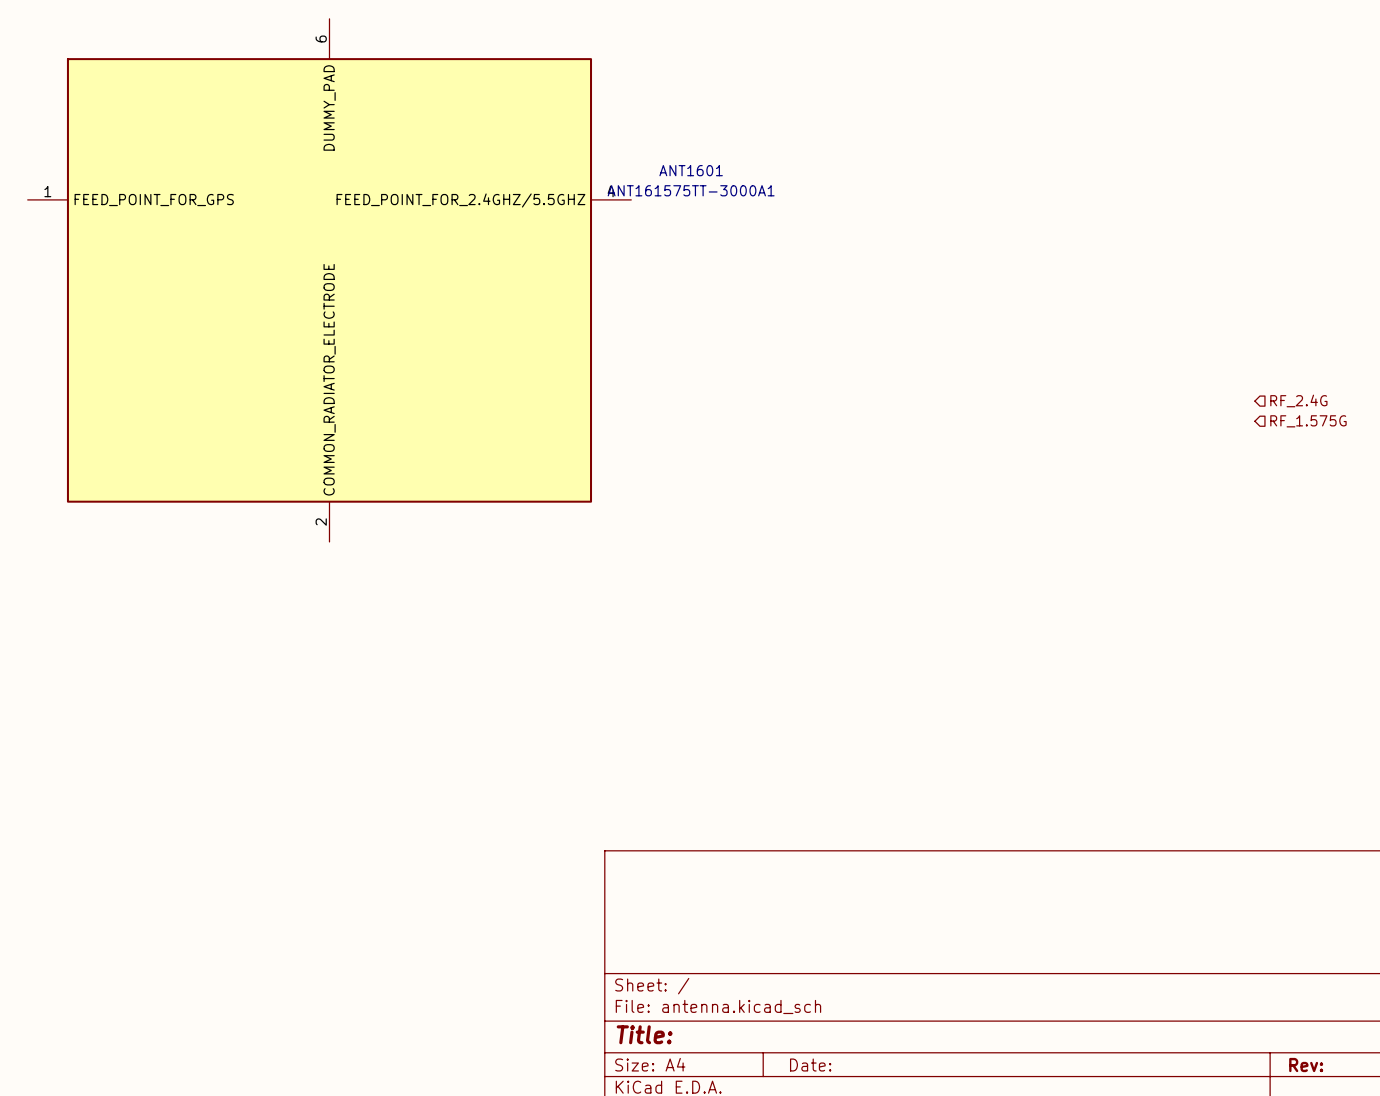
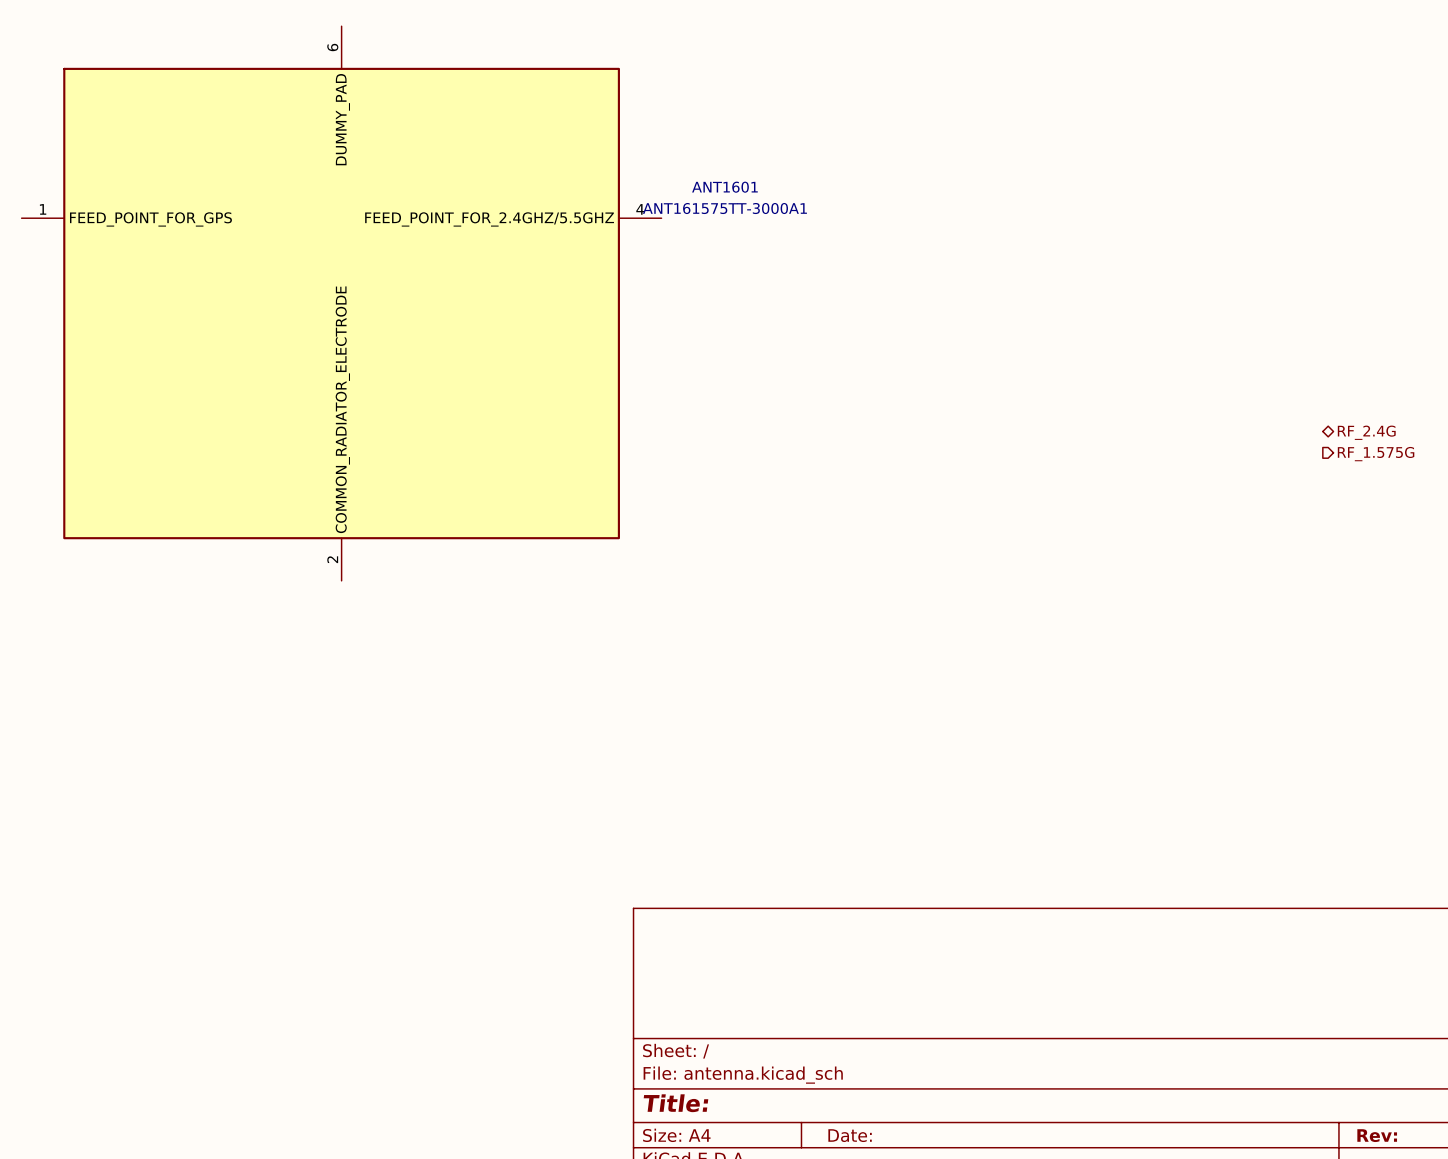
hierarchical label shape: input (1298, 400) -> bidirectional (1366, 432)
hierarchical label shape: input (1308, 421) -> output (1376, 454)

